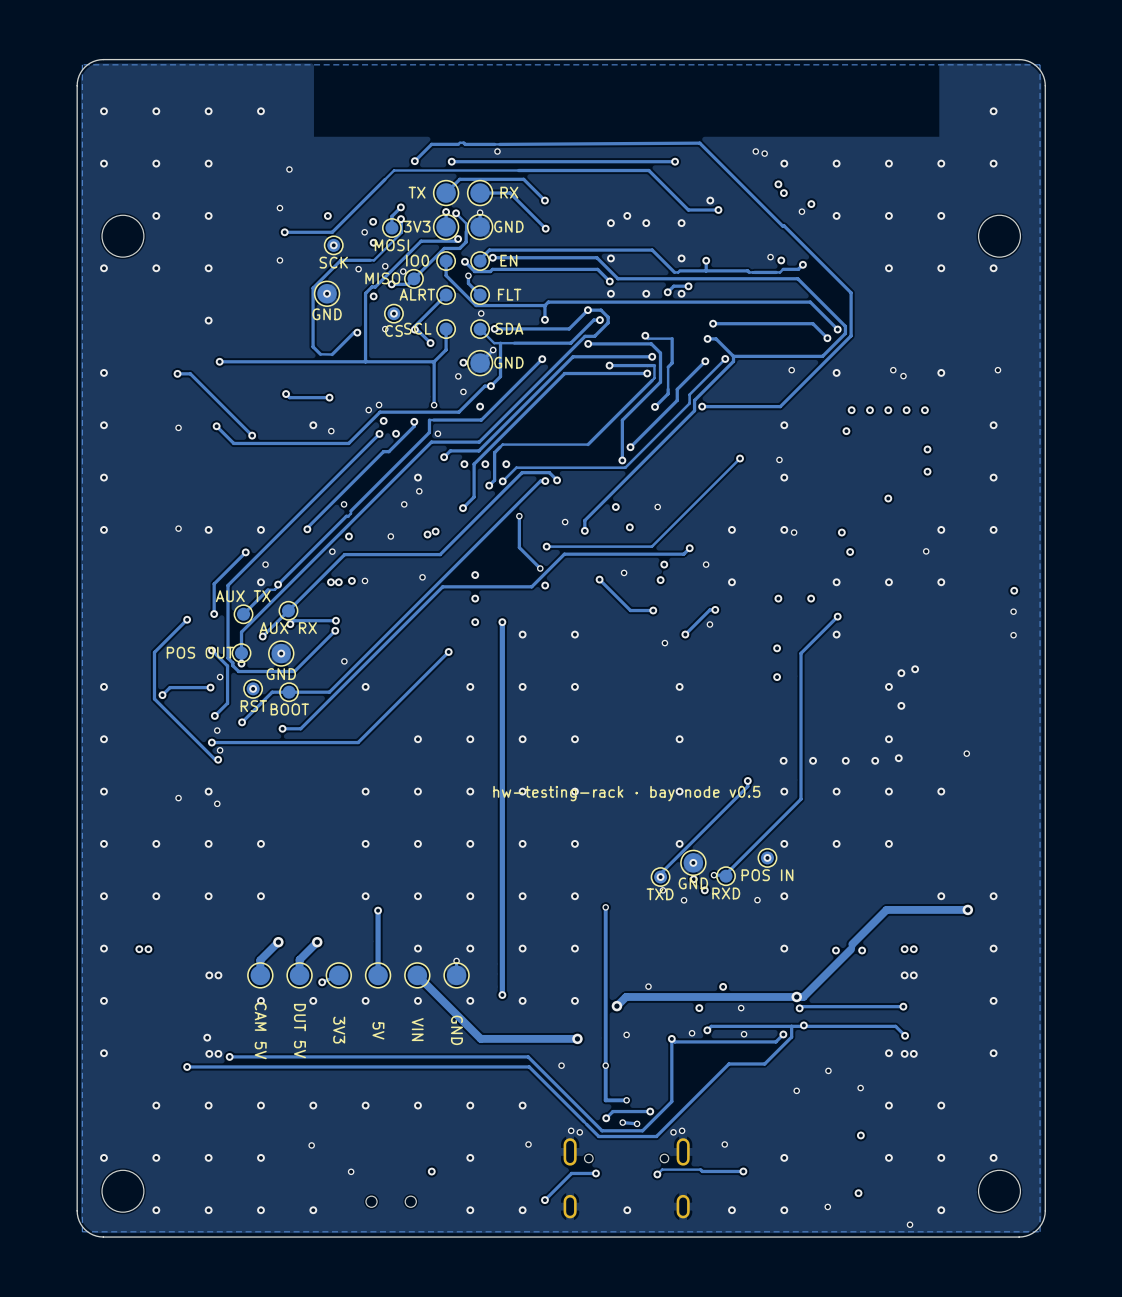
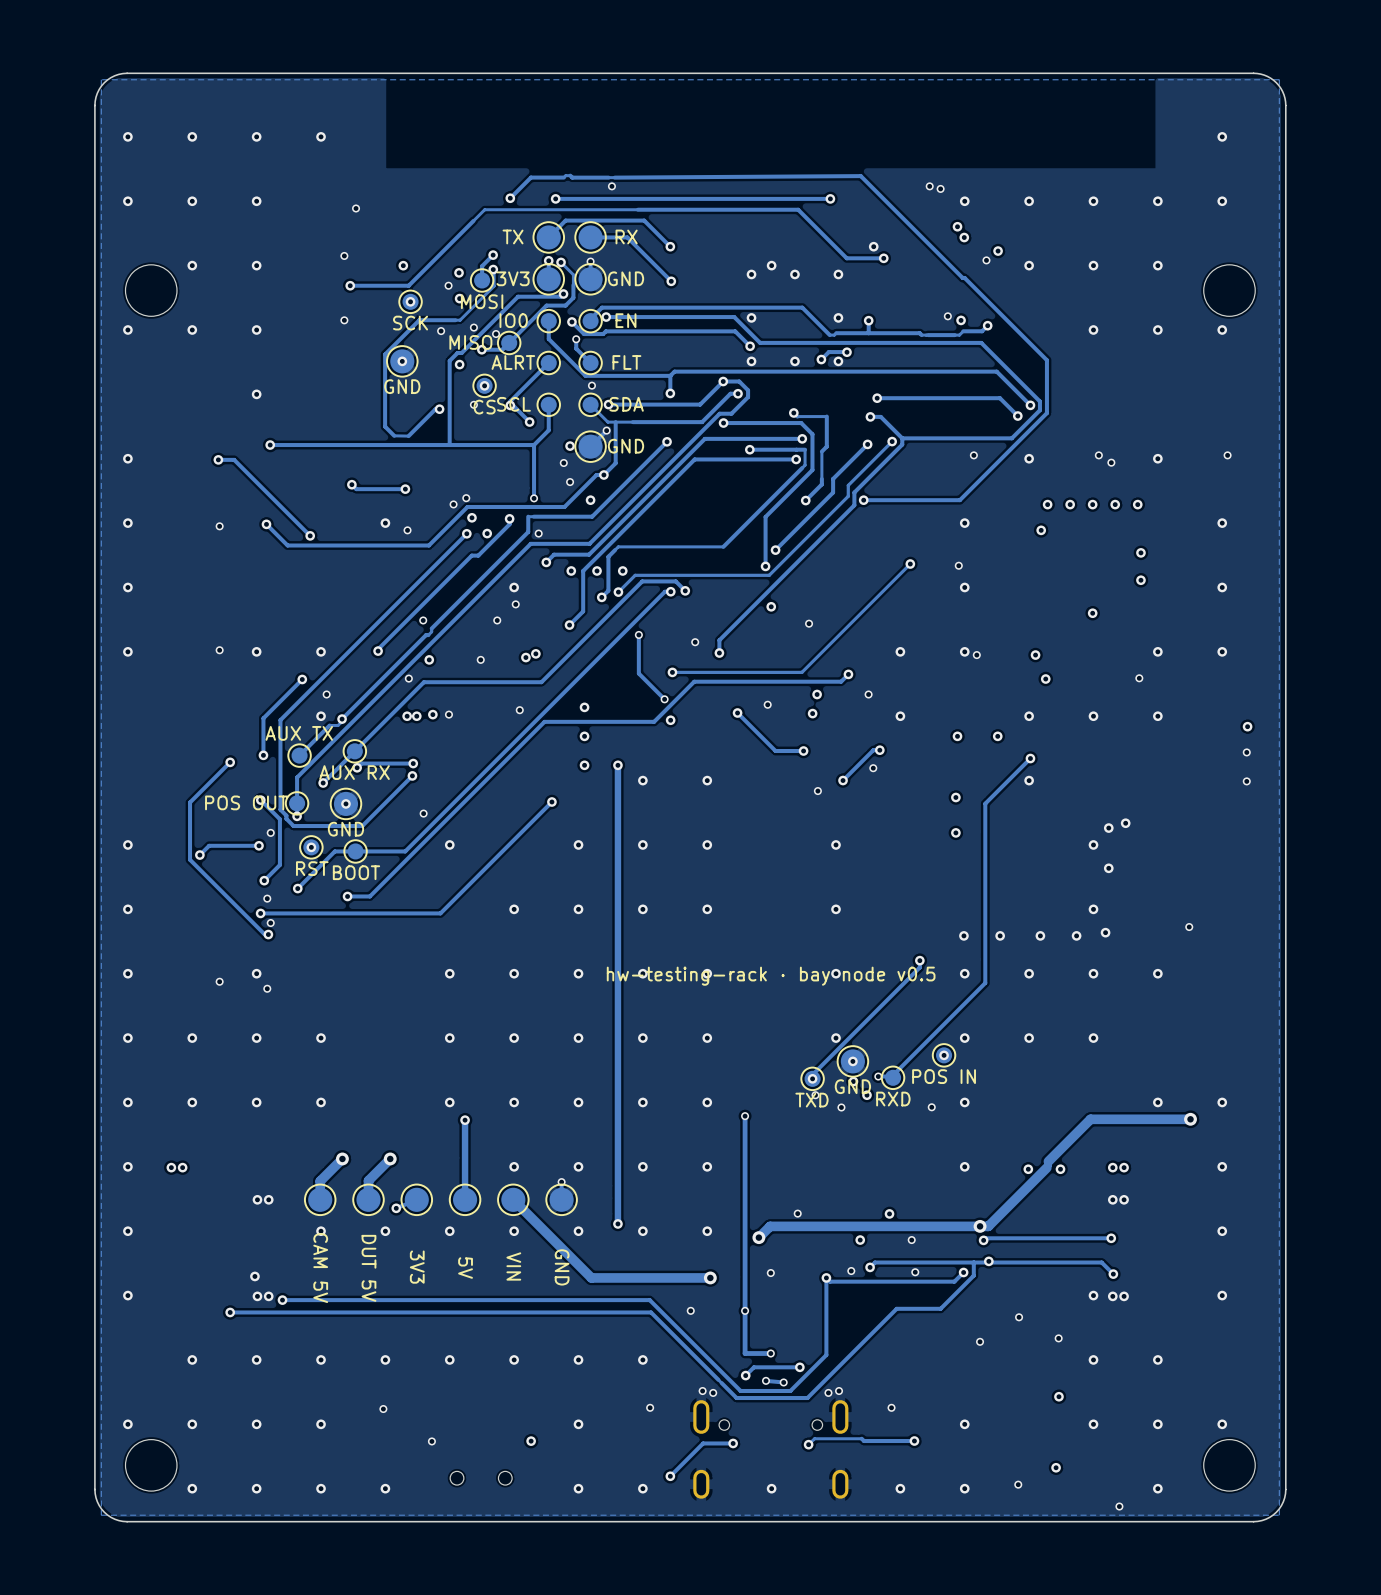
via: none -> (771, 606)
via: (615, 507) -> none
via: (629, 527) -> none

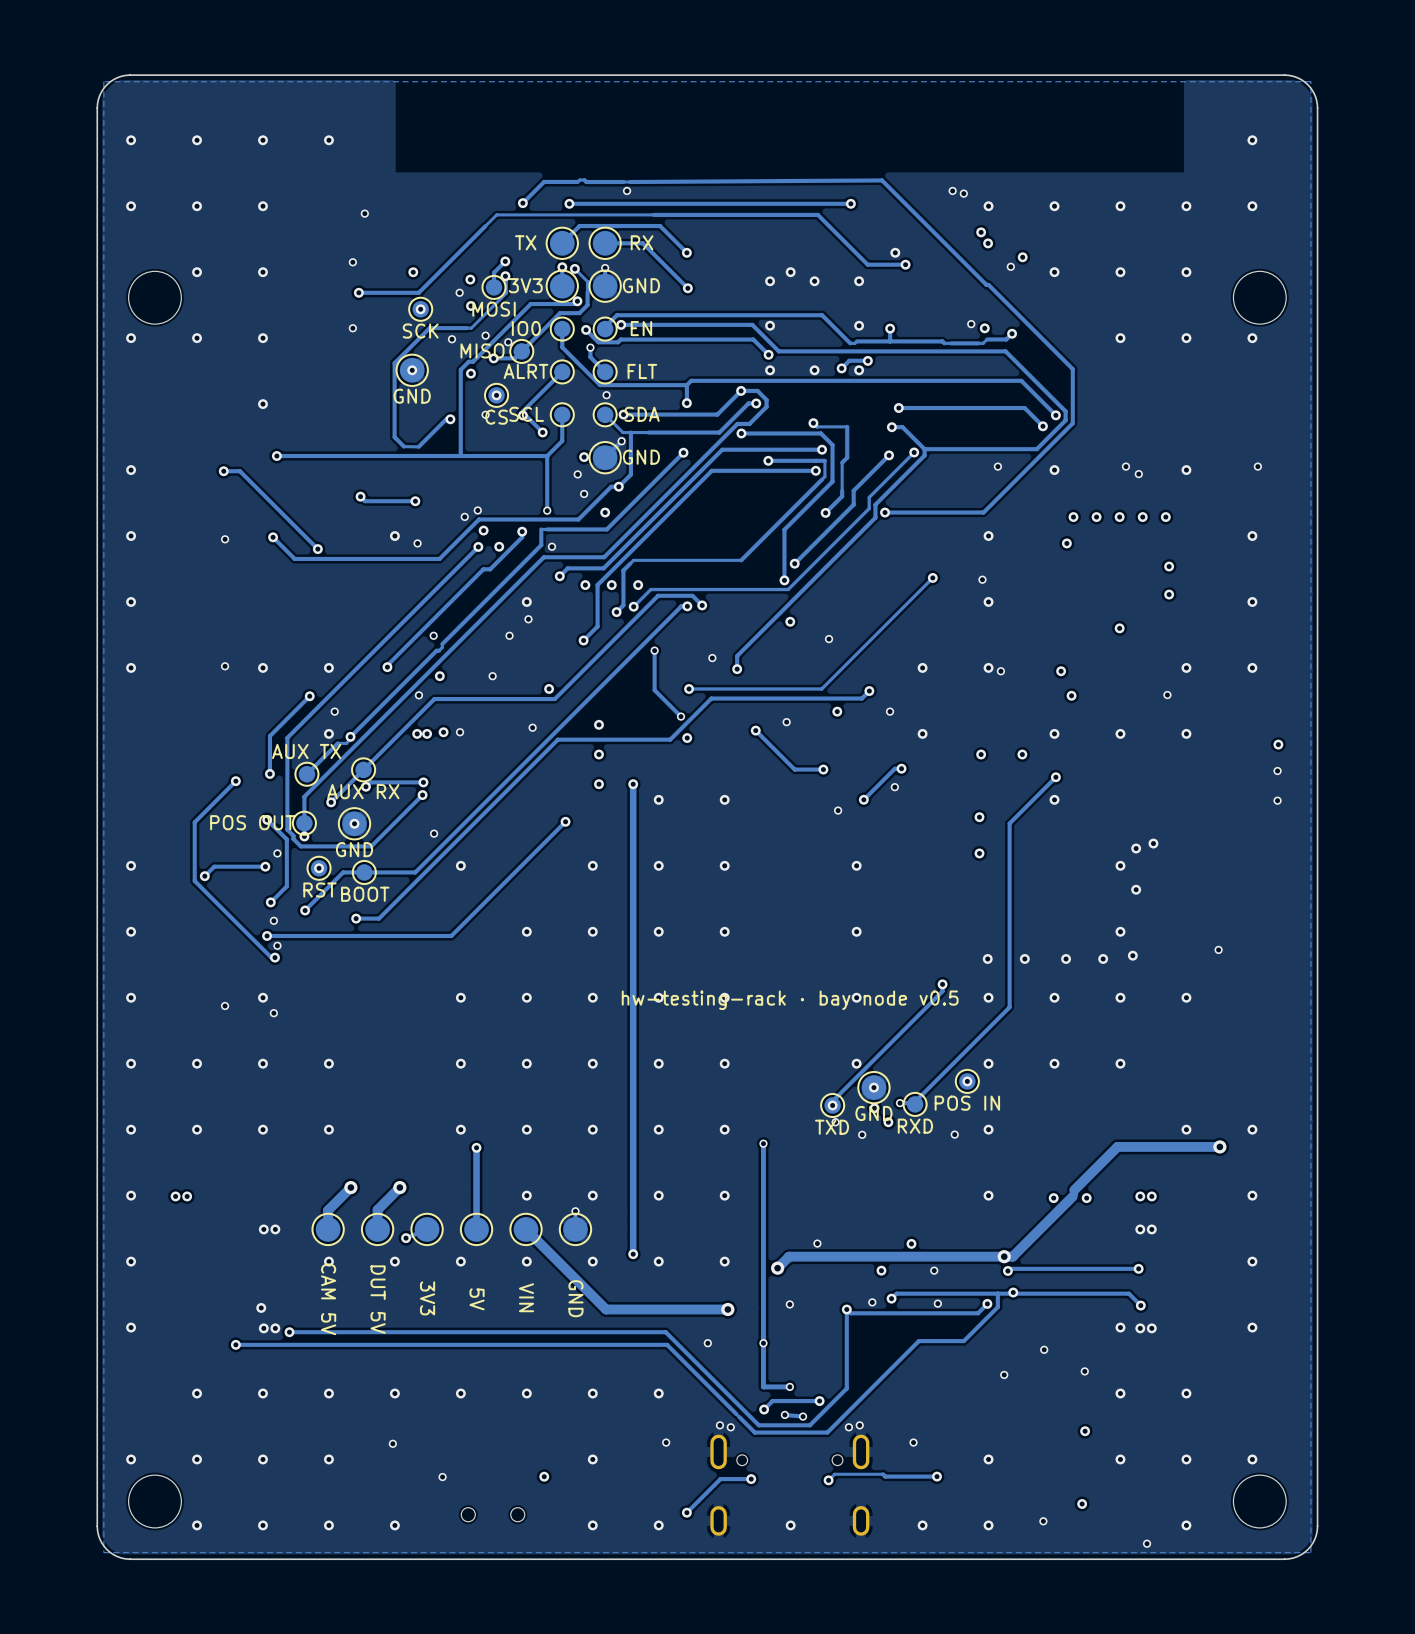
via: (535, 653) -> none
via: (525, 657) -> none
via: none -> (549, 688)
via: (812, 713) -> none

